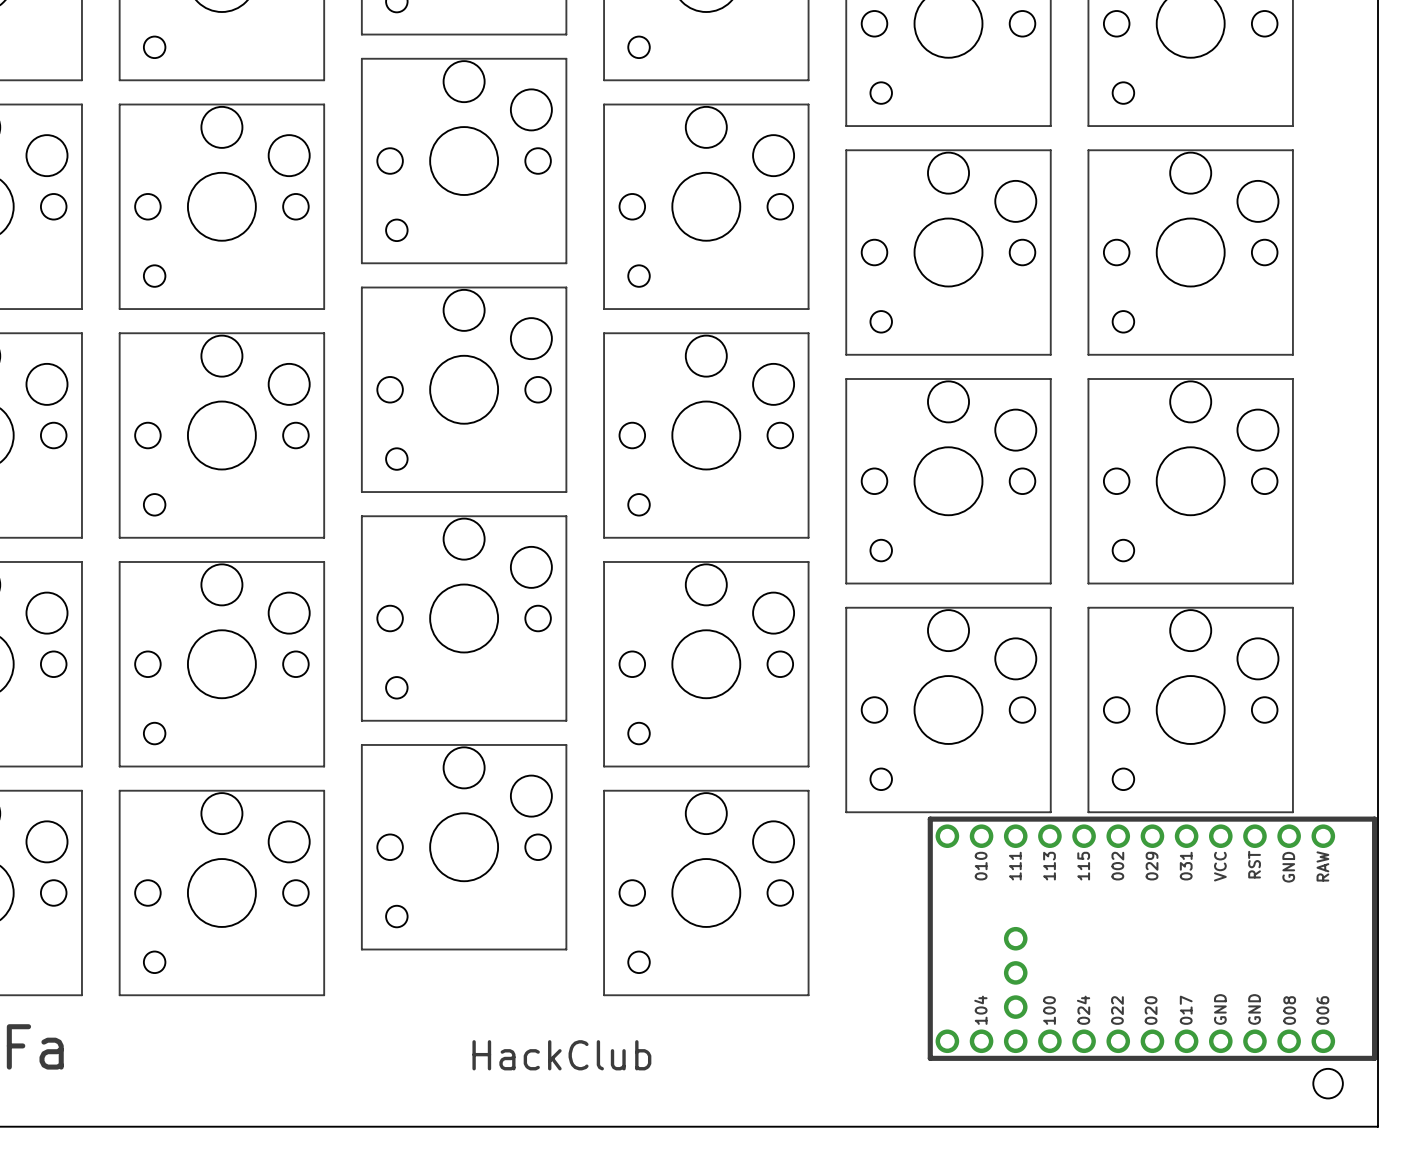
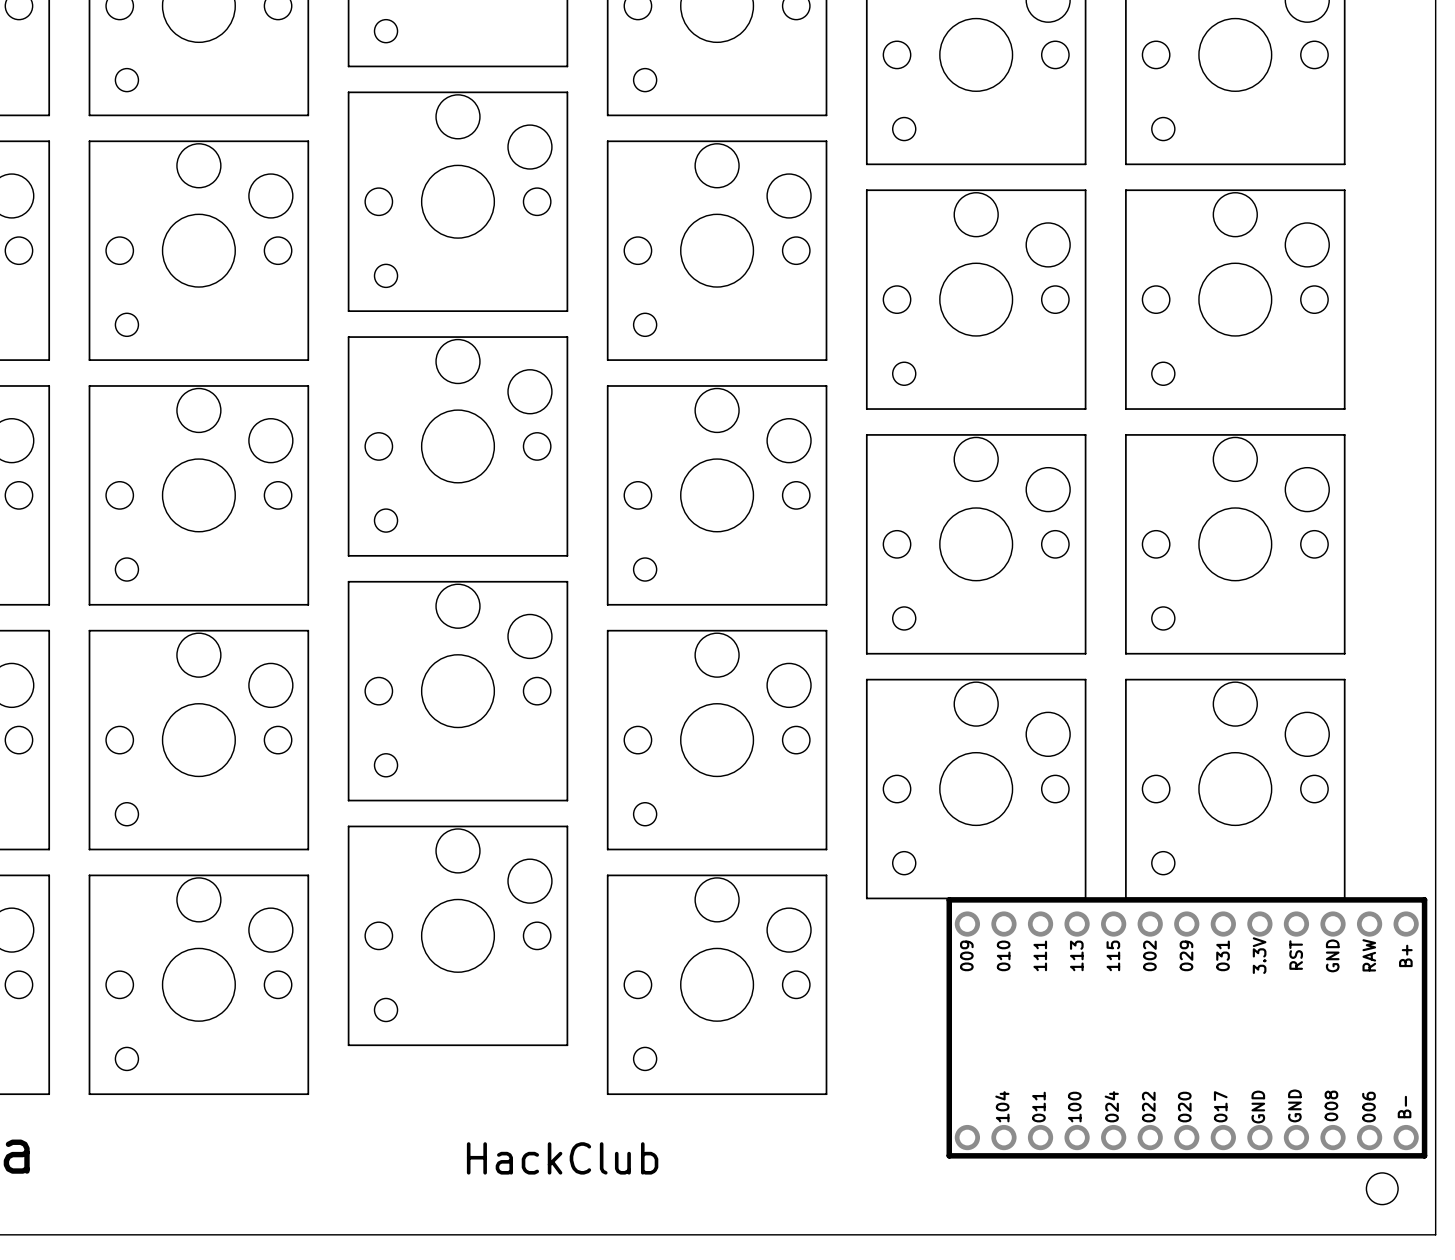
part footprint: [927, 816, 1378, 1061] -> [946, 897, 1428, 1159]

